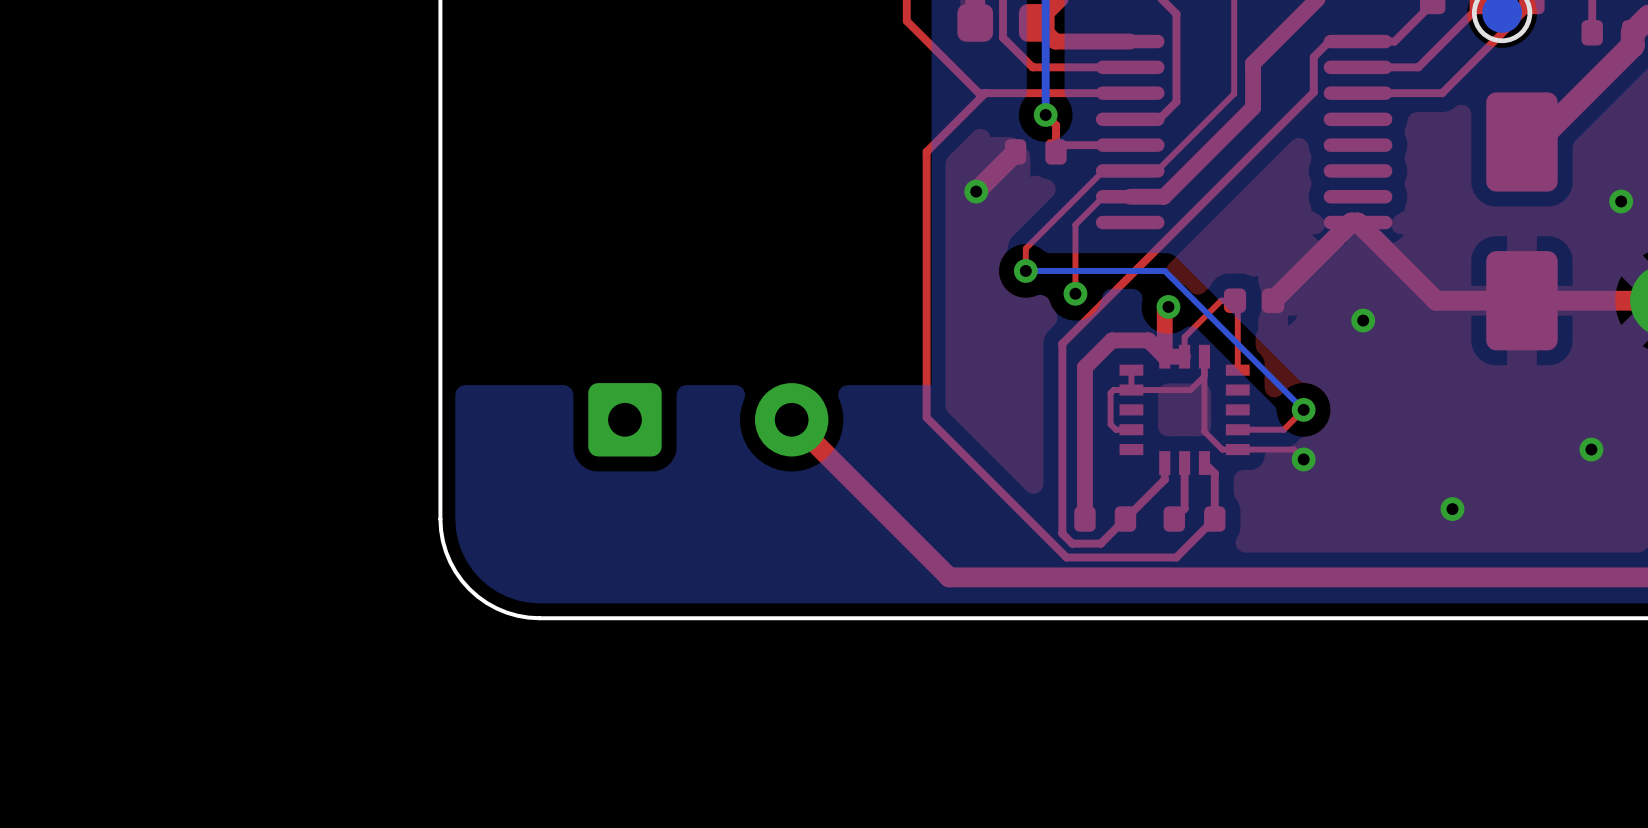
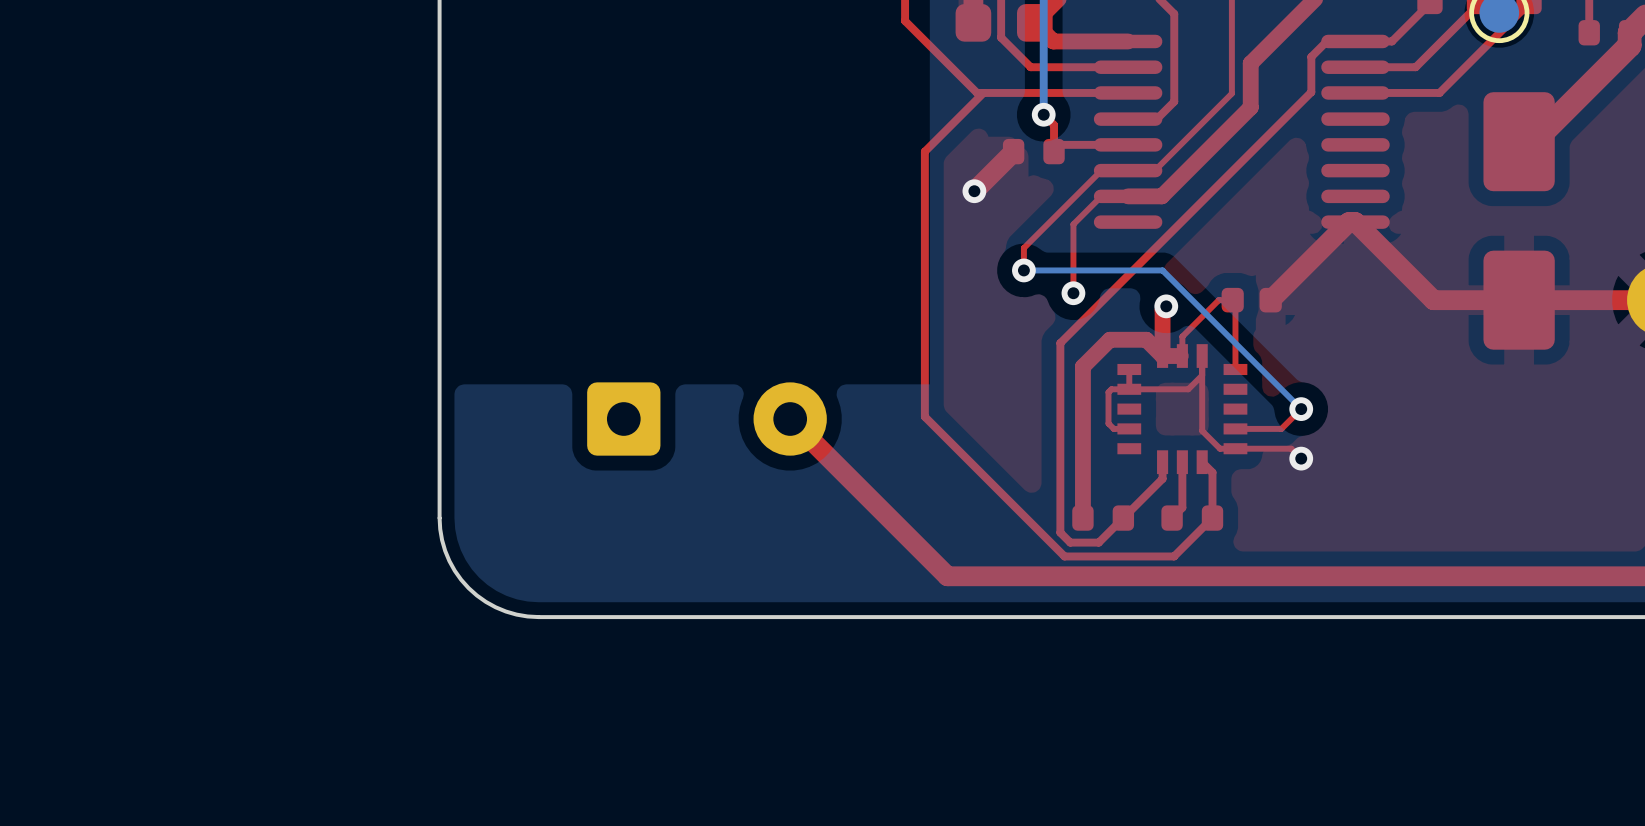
via: (1621, 201) -> none
via: (1363, 320) -> none
via: (1591, 449) -> none
via: (1452, 509) -> none

